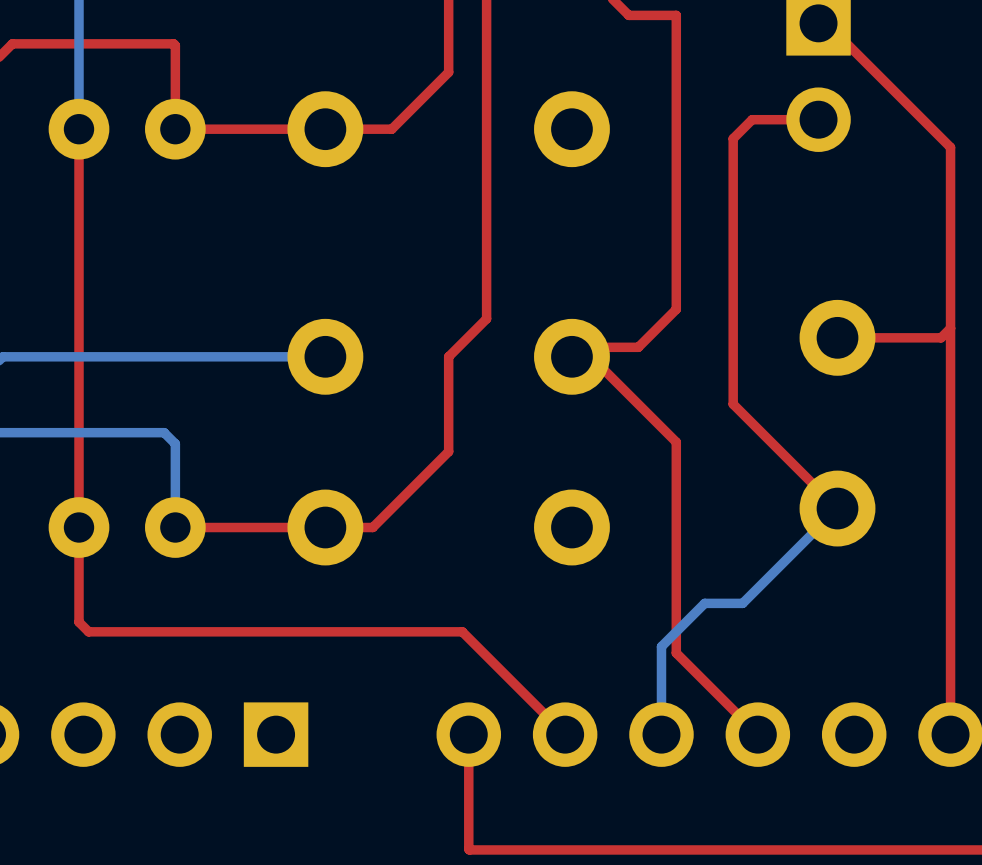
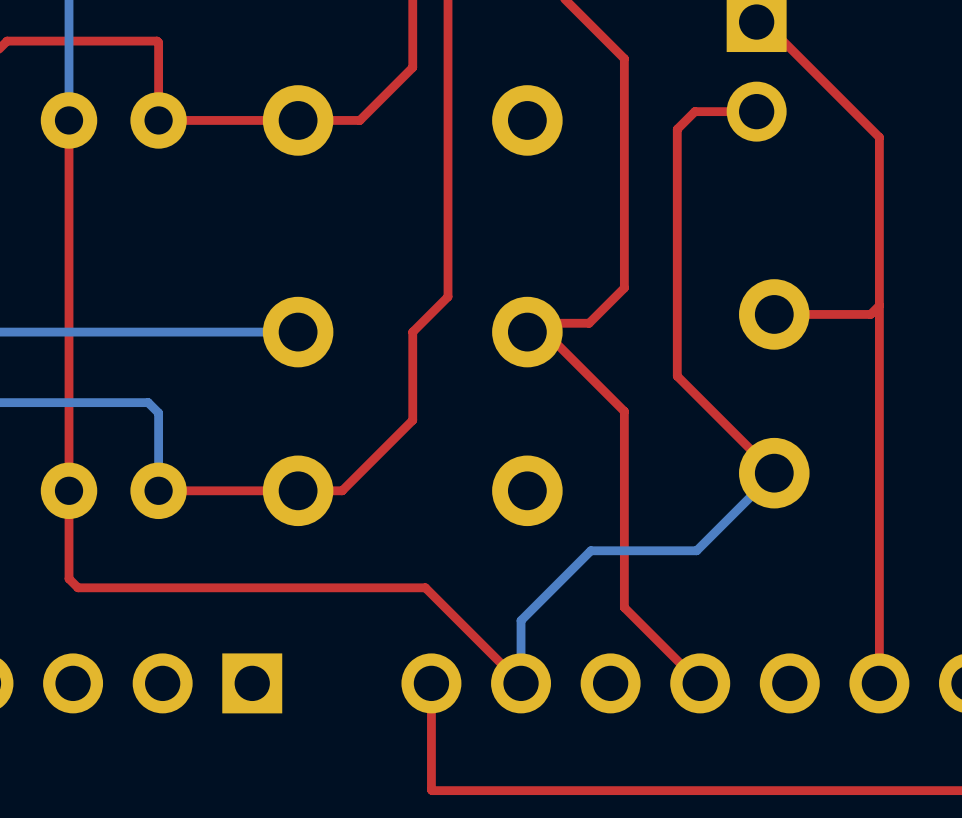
top track: (628, 15) (676, 15) (676, 62) -> (580, 14) (624, 58)
bottom track: (754, 592) (742, 603) (704, 603) (661, 646) (661, 734) -> (696, 550) (590, 550) (521, 620) (521, 683)

